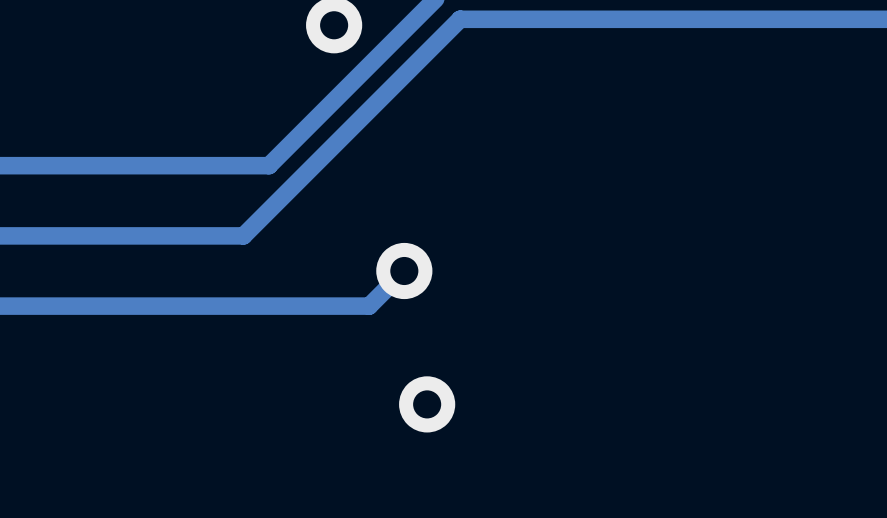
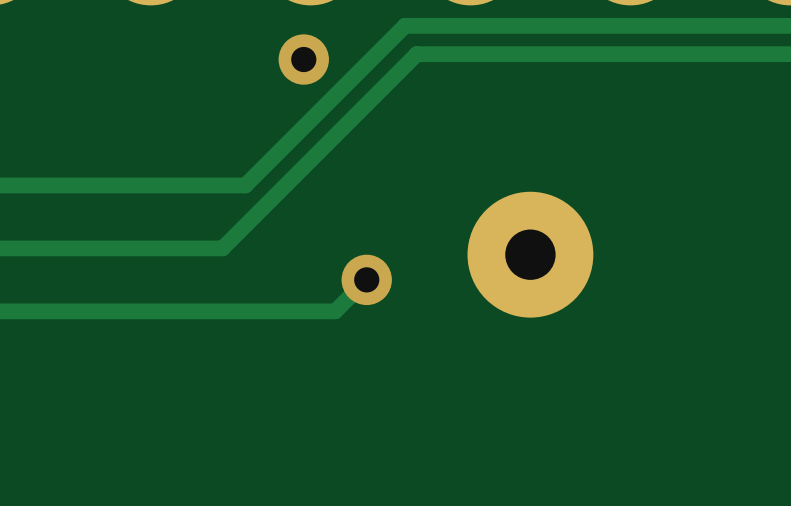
part: none -> (530, 254)
via: (427, 404) -> none

